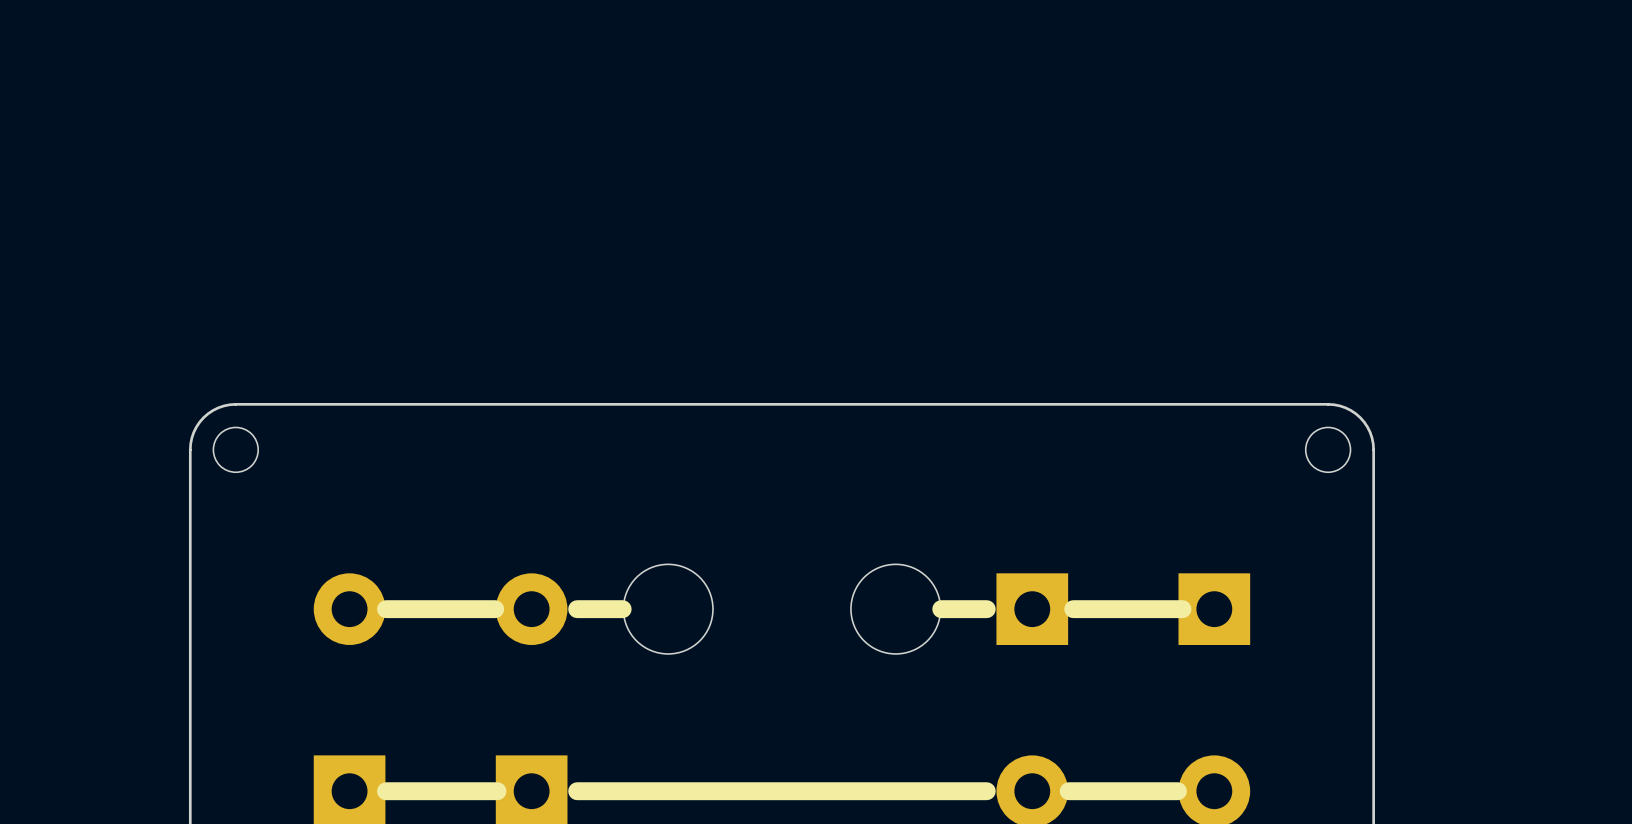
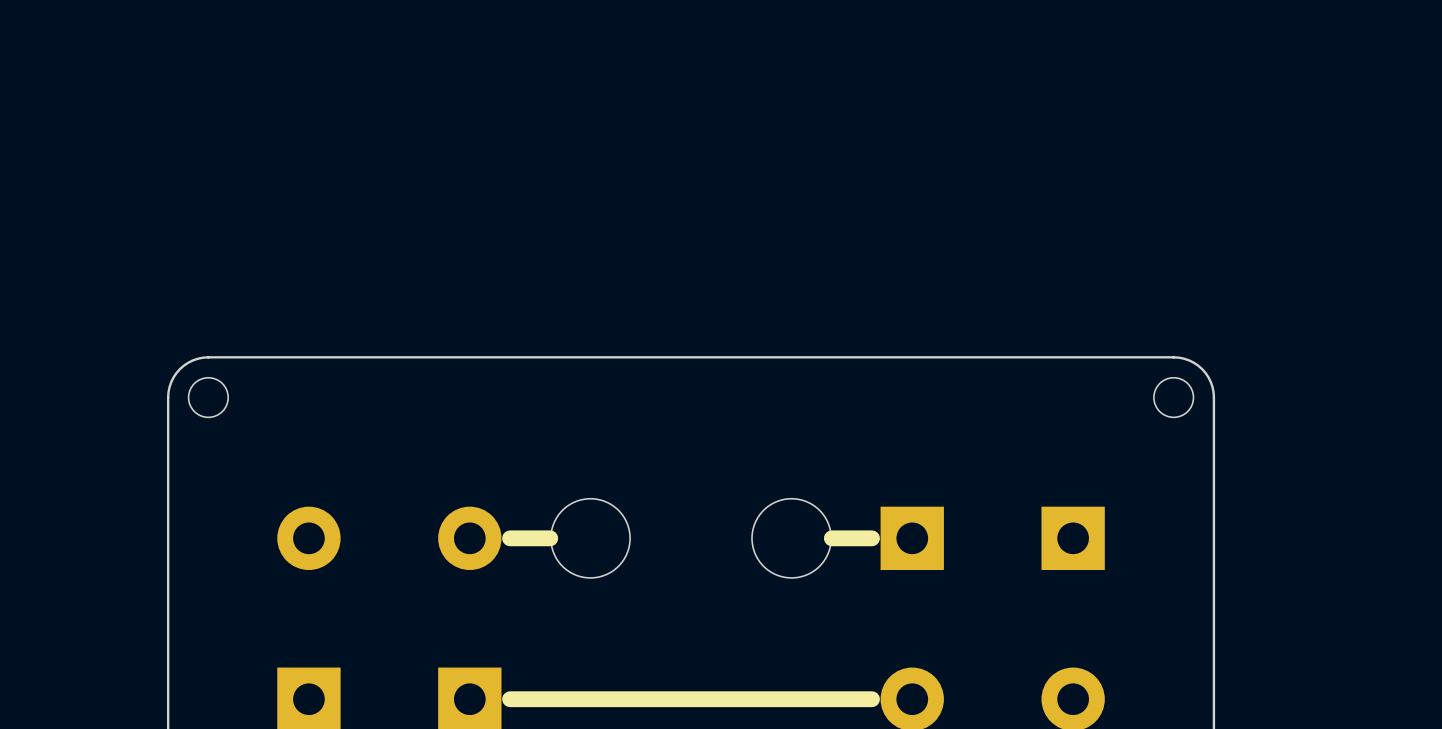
line: (495, 609) (385, 609) -> none
line: (1182, 609) (1073, 609) -> none
line: (497, 791) (385, 791) -> none
line: (1177, 791) (1068, 791) -> none

